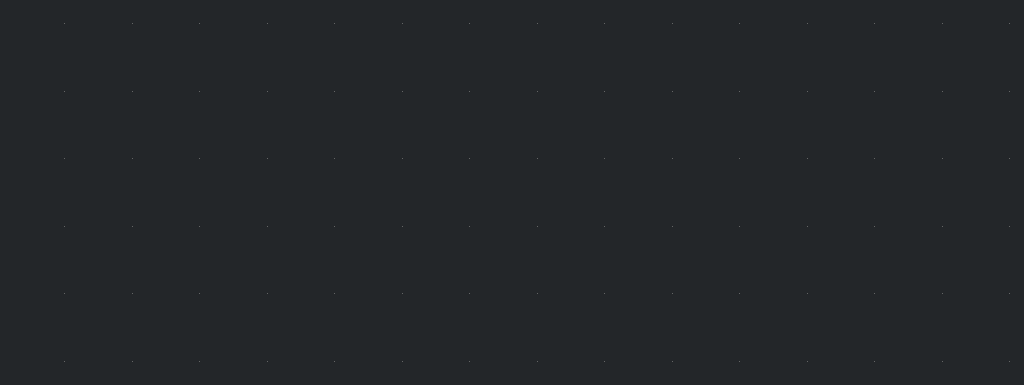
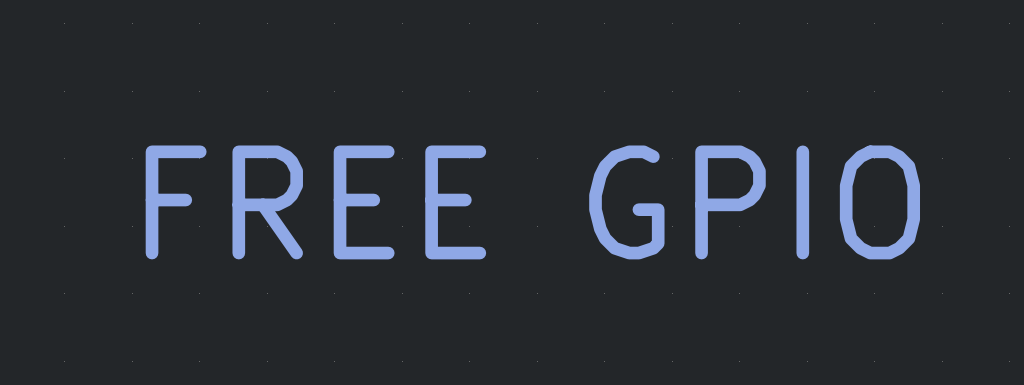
text: none -> FREE GPIO (532, 202)

